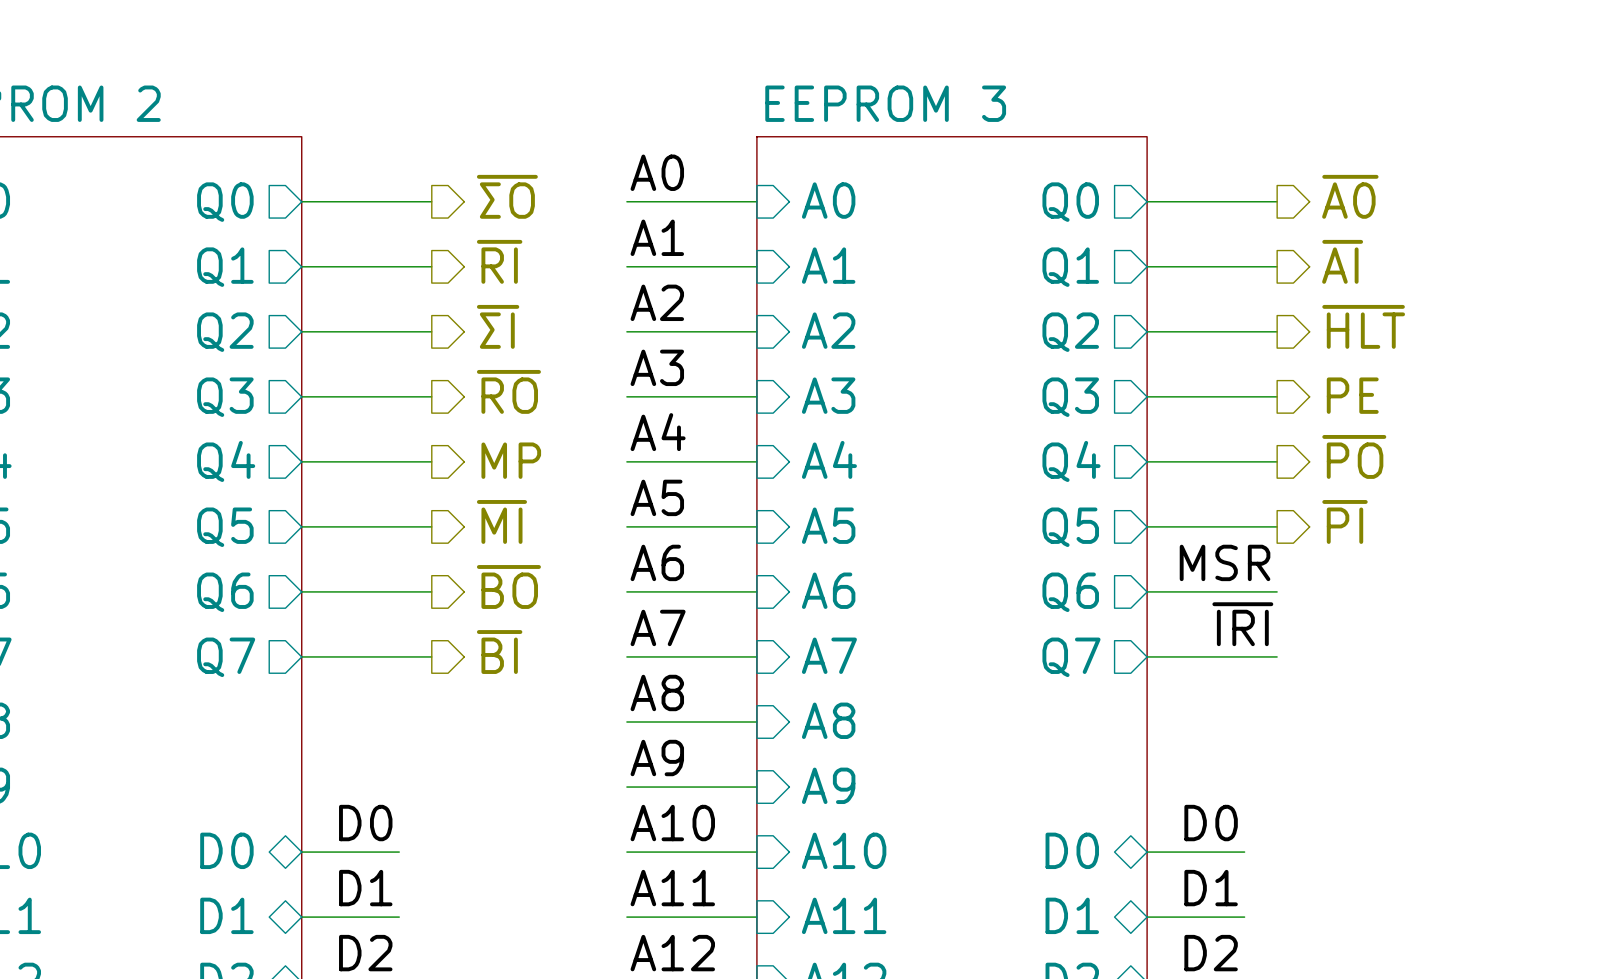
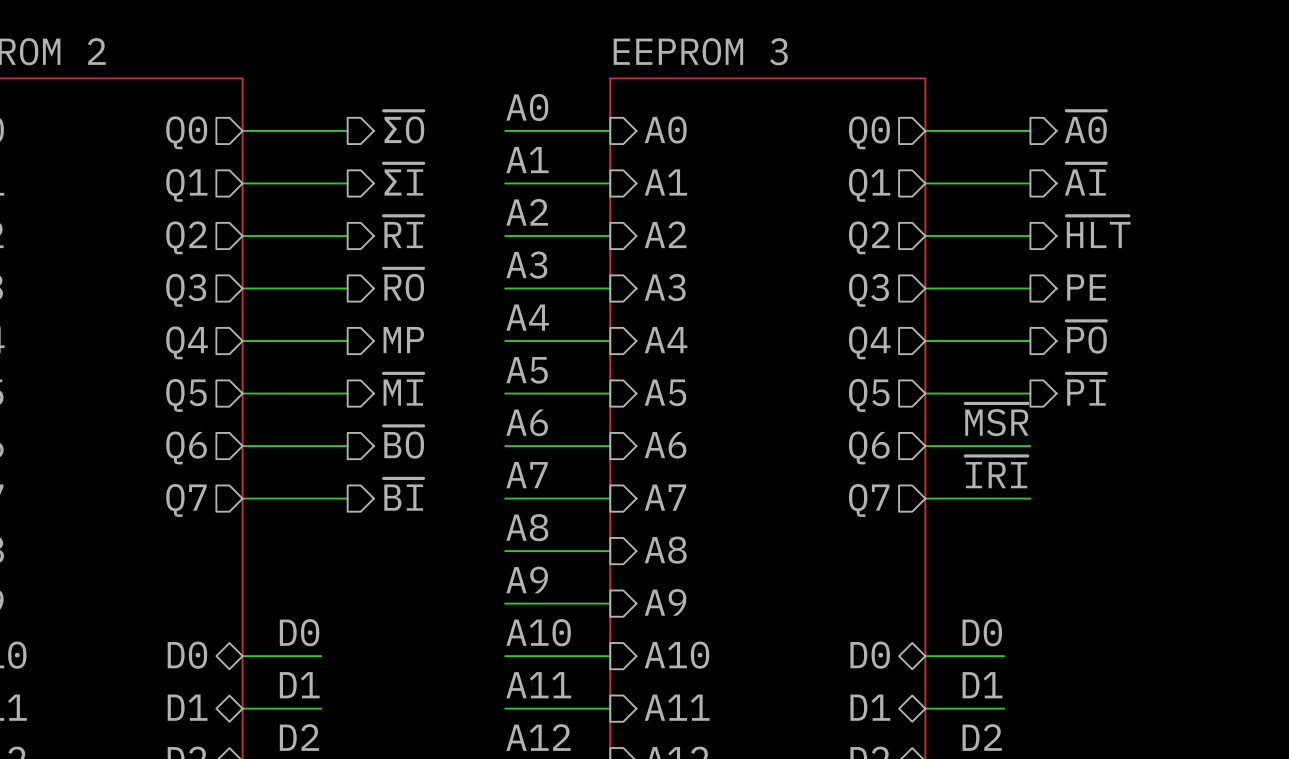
hierarchical label: ~{RI} (499, 261) -> ~{ΣI} (403, 179)
hierarchical label: ~{ΣI} (498, 326) -> ~{RI} (403, 231)
label: MSR (1225, 562) -> ~{MSR} (996, 419)

